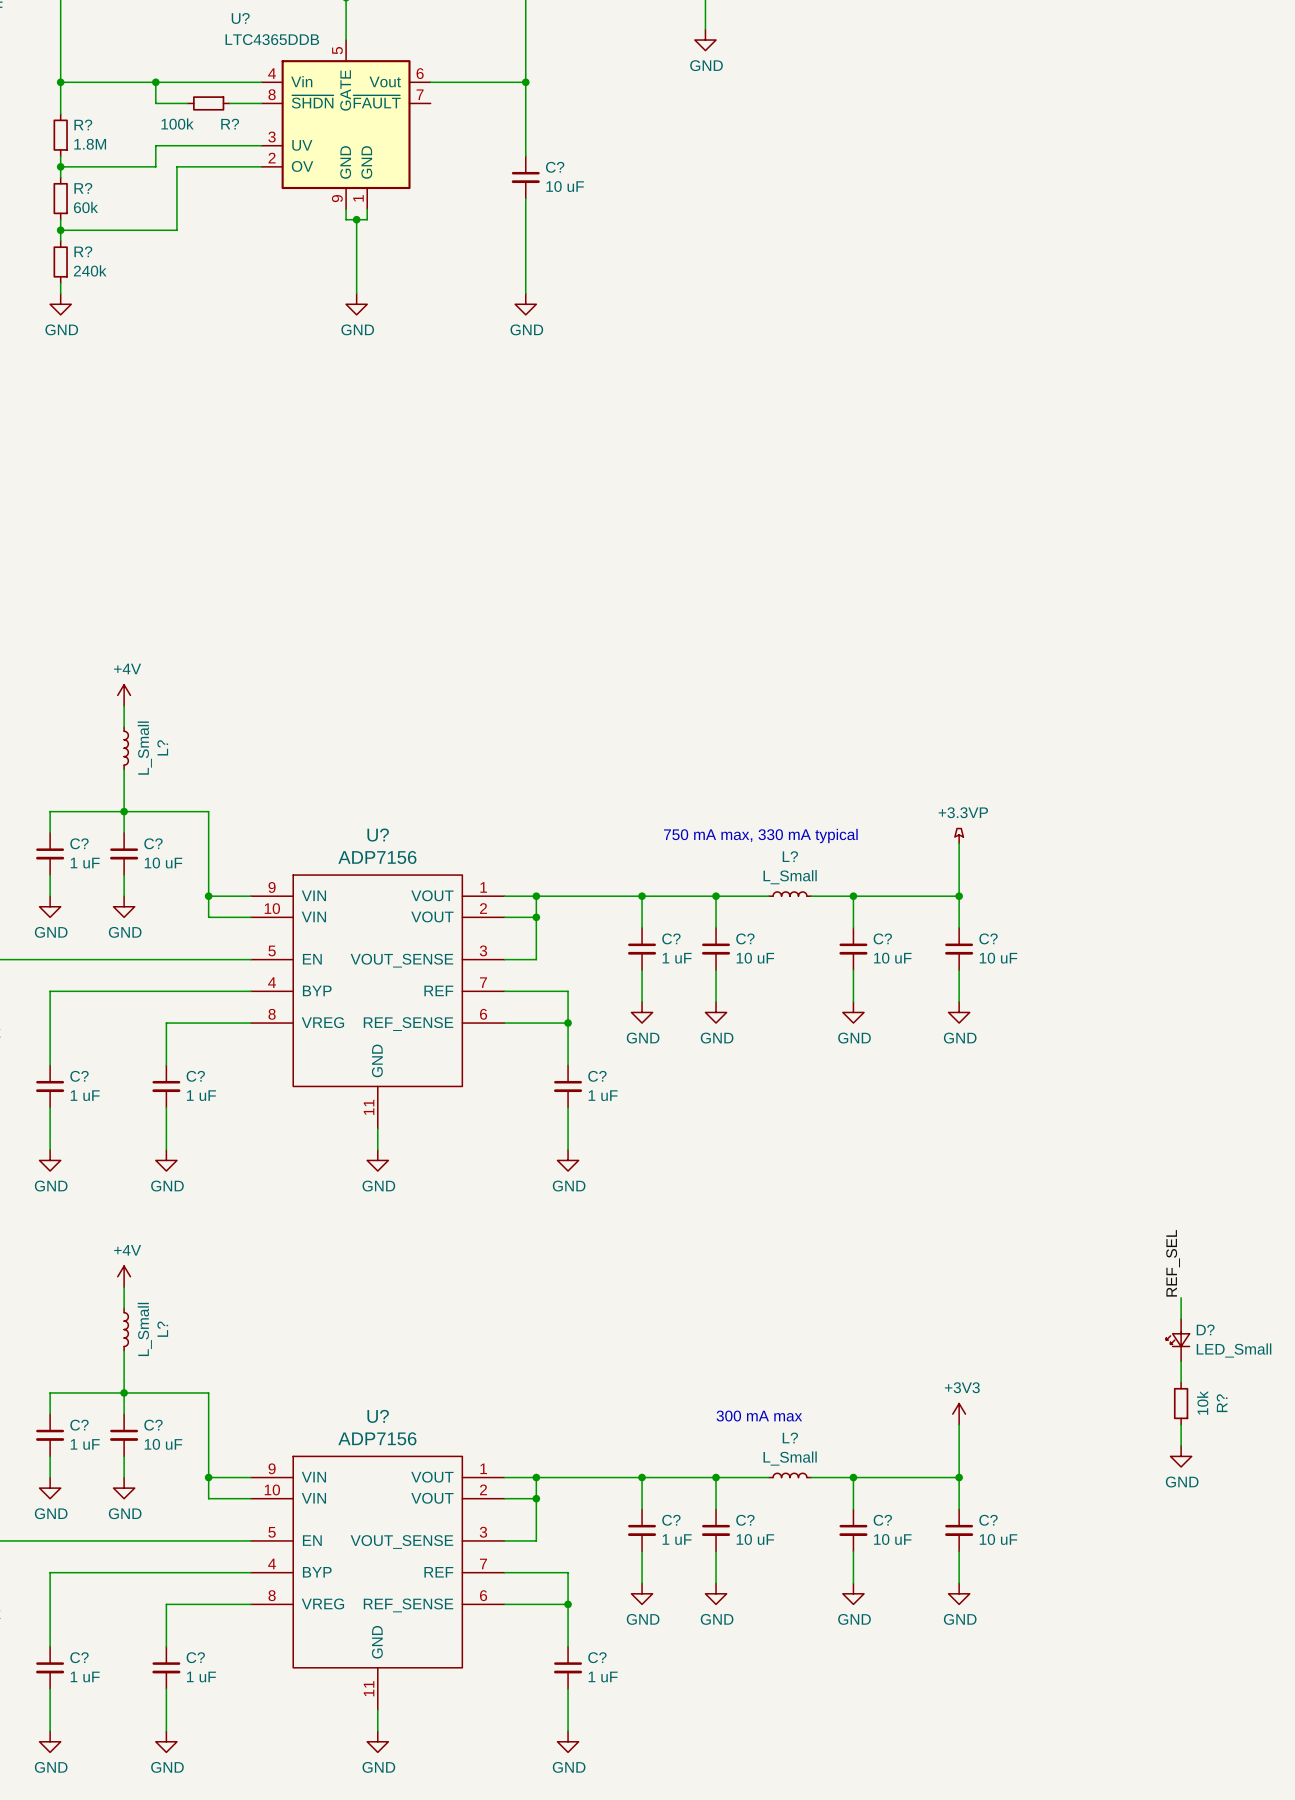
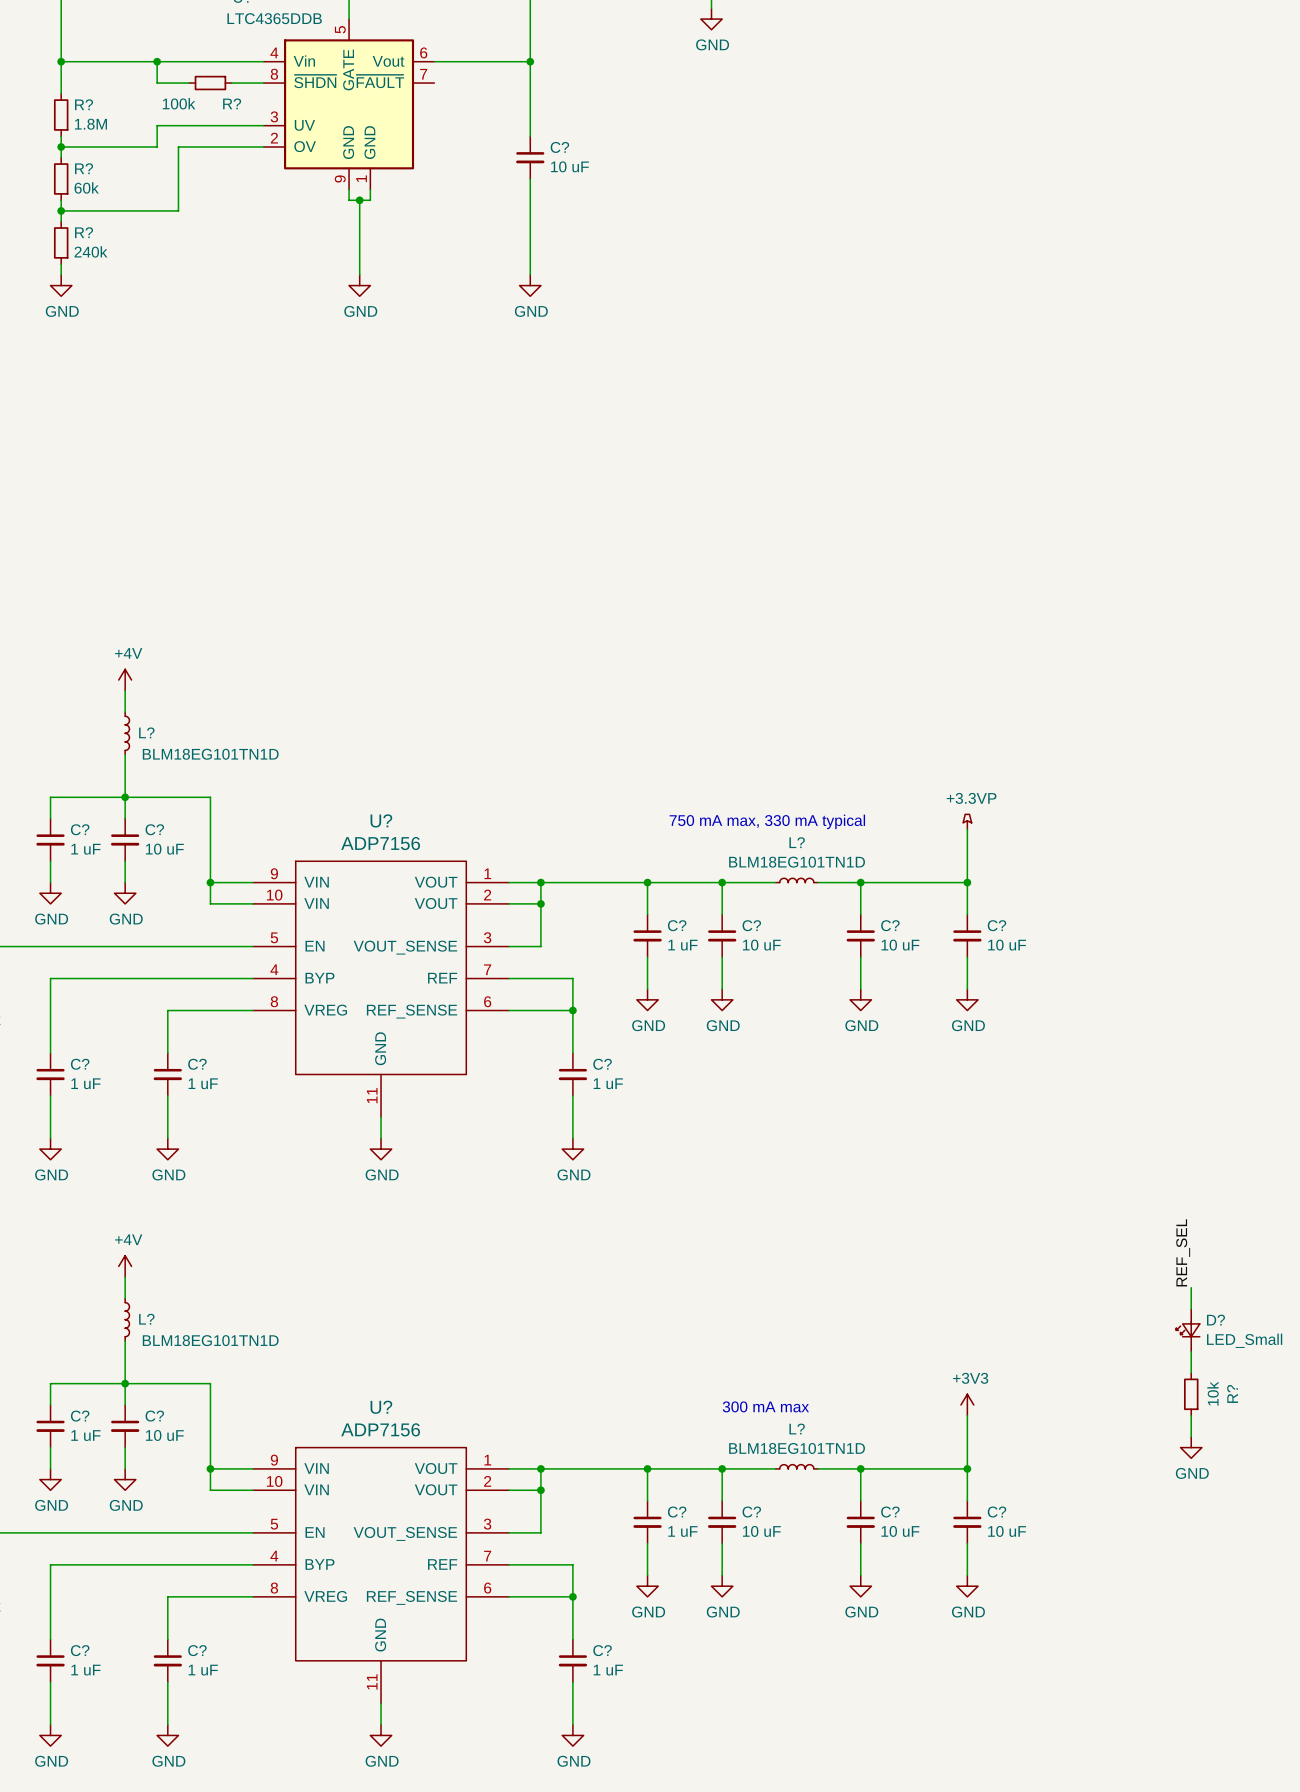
L? name rotation: 0° (162, 747) -> 90° clockwise (146, 732)
L? value: L_Small (144, 748) -> BLM18EG101TN1D (210, 754)
L? value: L_Small (790, 877) -> BLM18EG101TN1D (797, 862)
L? value: L_Small (144, 1329) -> BLM18EG101TN1D (210, 1340)
L? name rotation: 0° (162, 1329) -> 90° clockwise (146, 1319)
L? value: L_Small (790, 1458) -> BLM18EG101TN1D (797, 1448)

